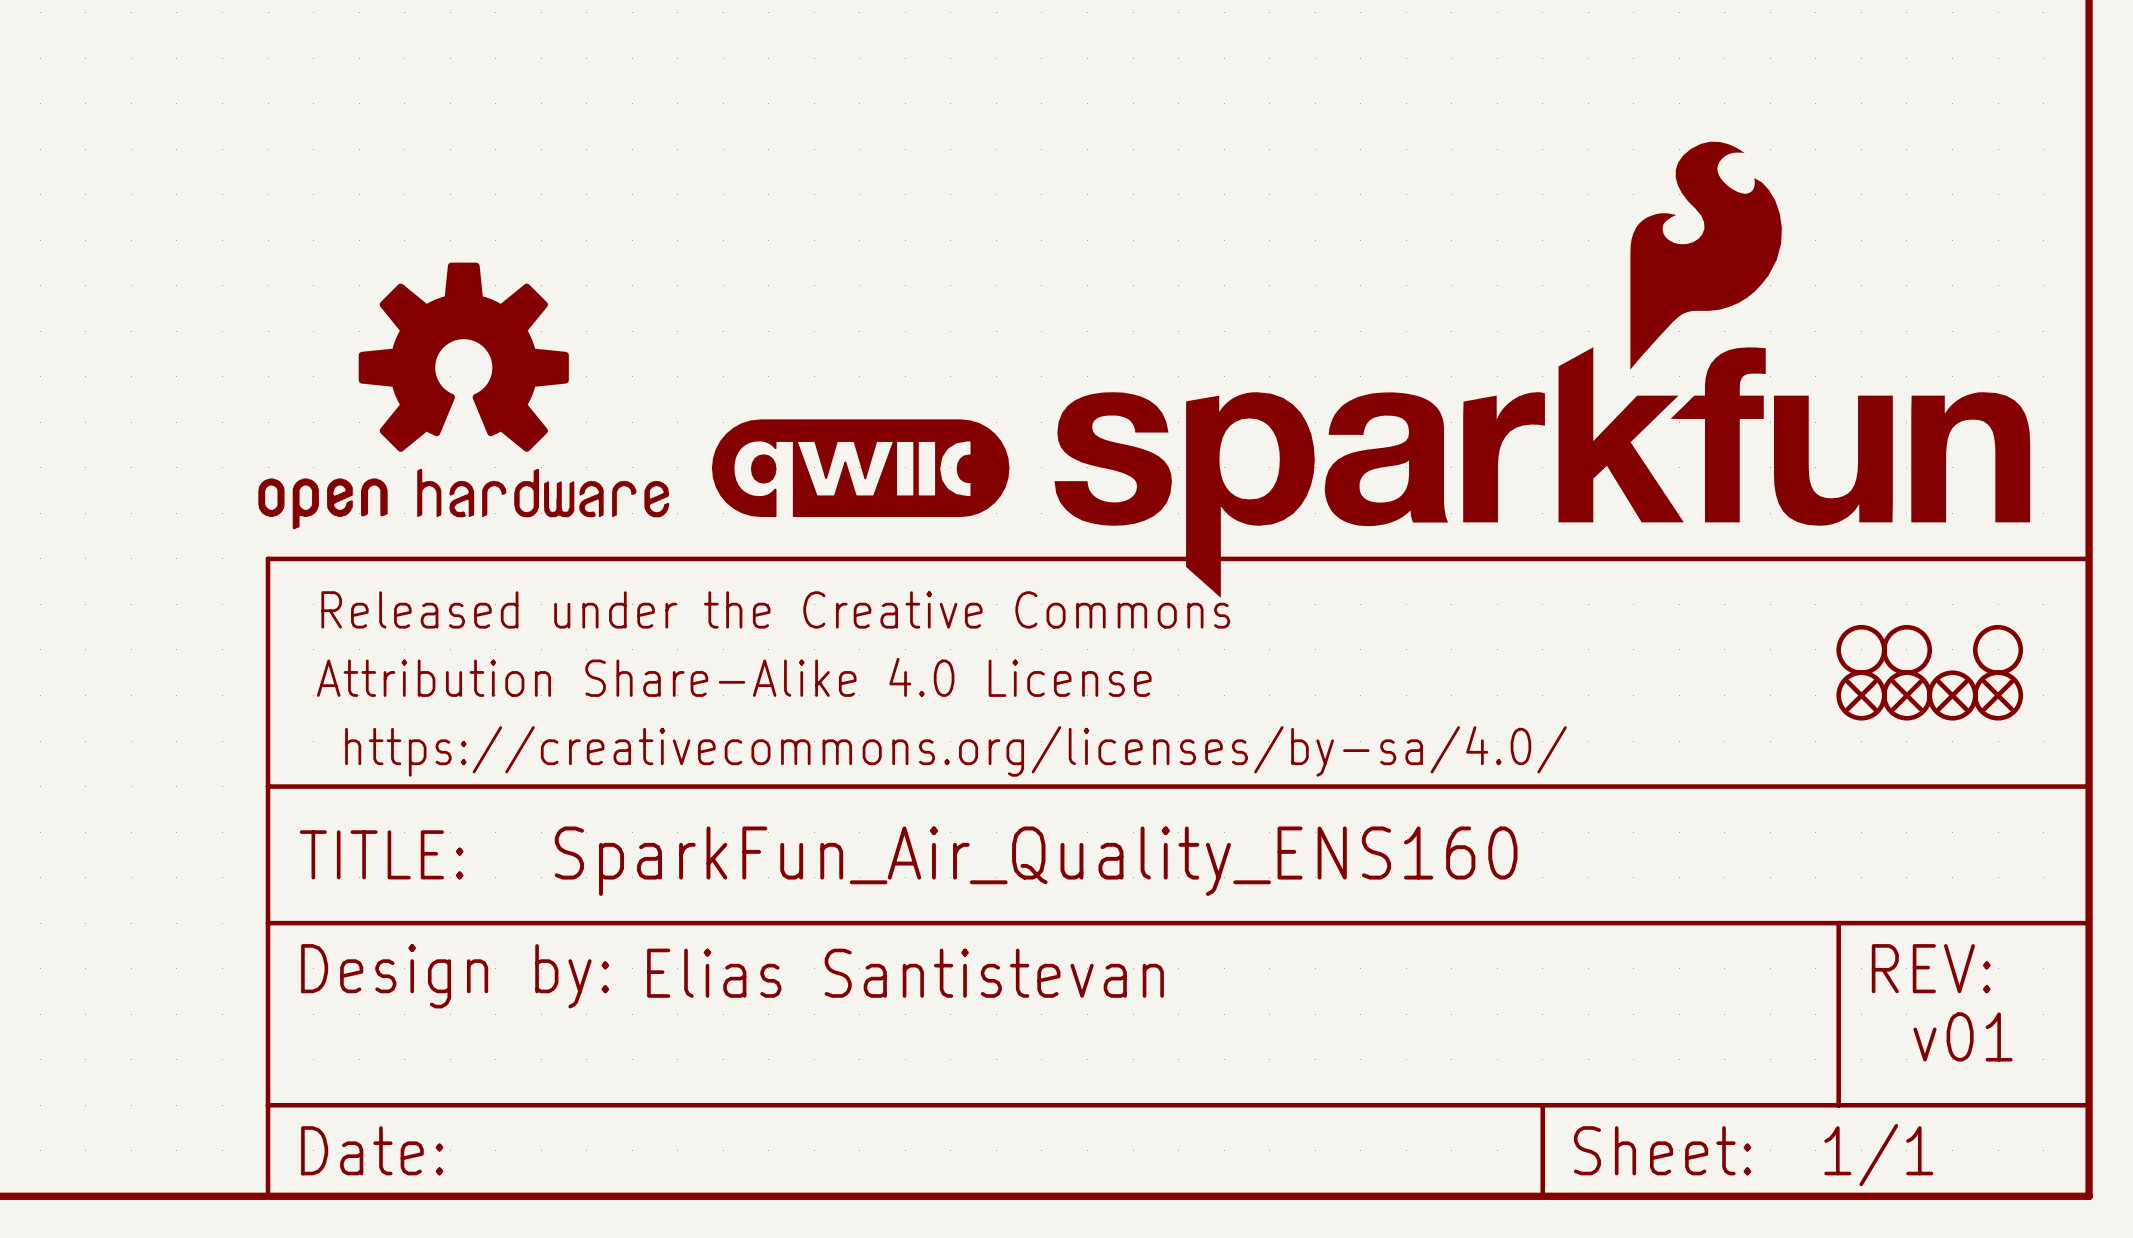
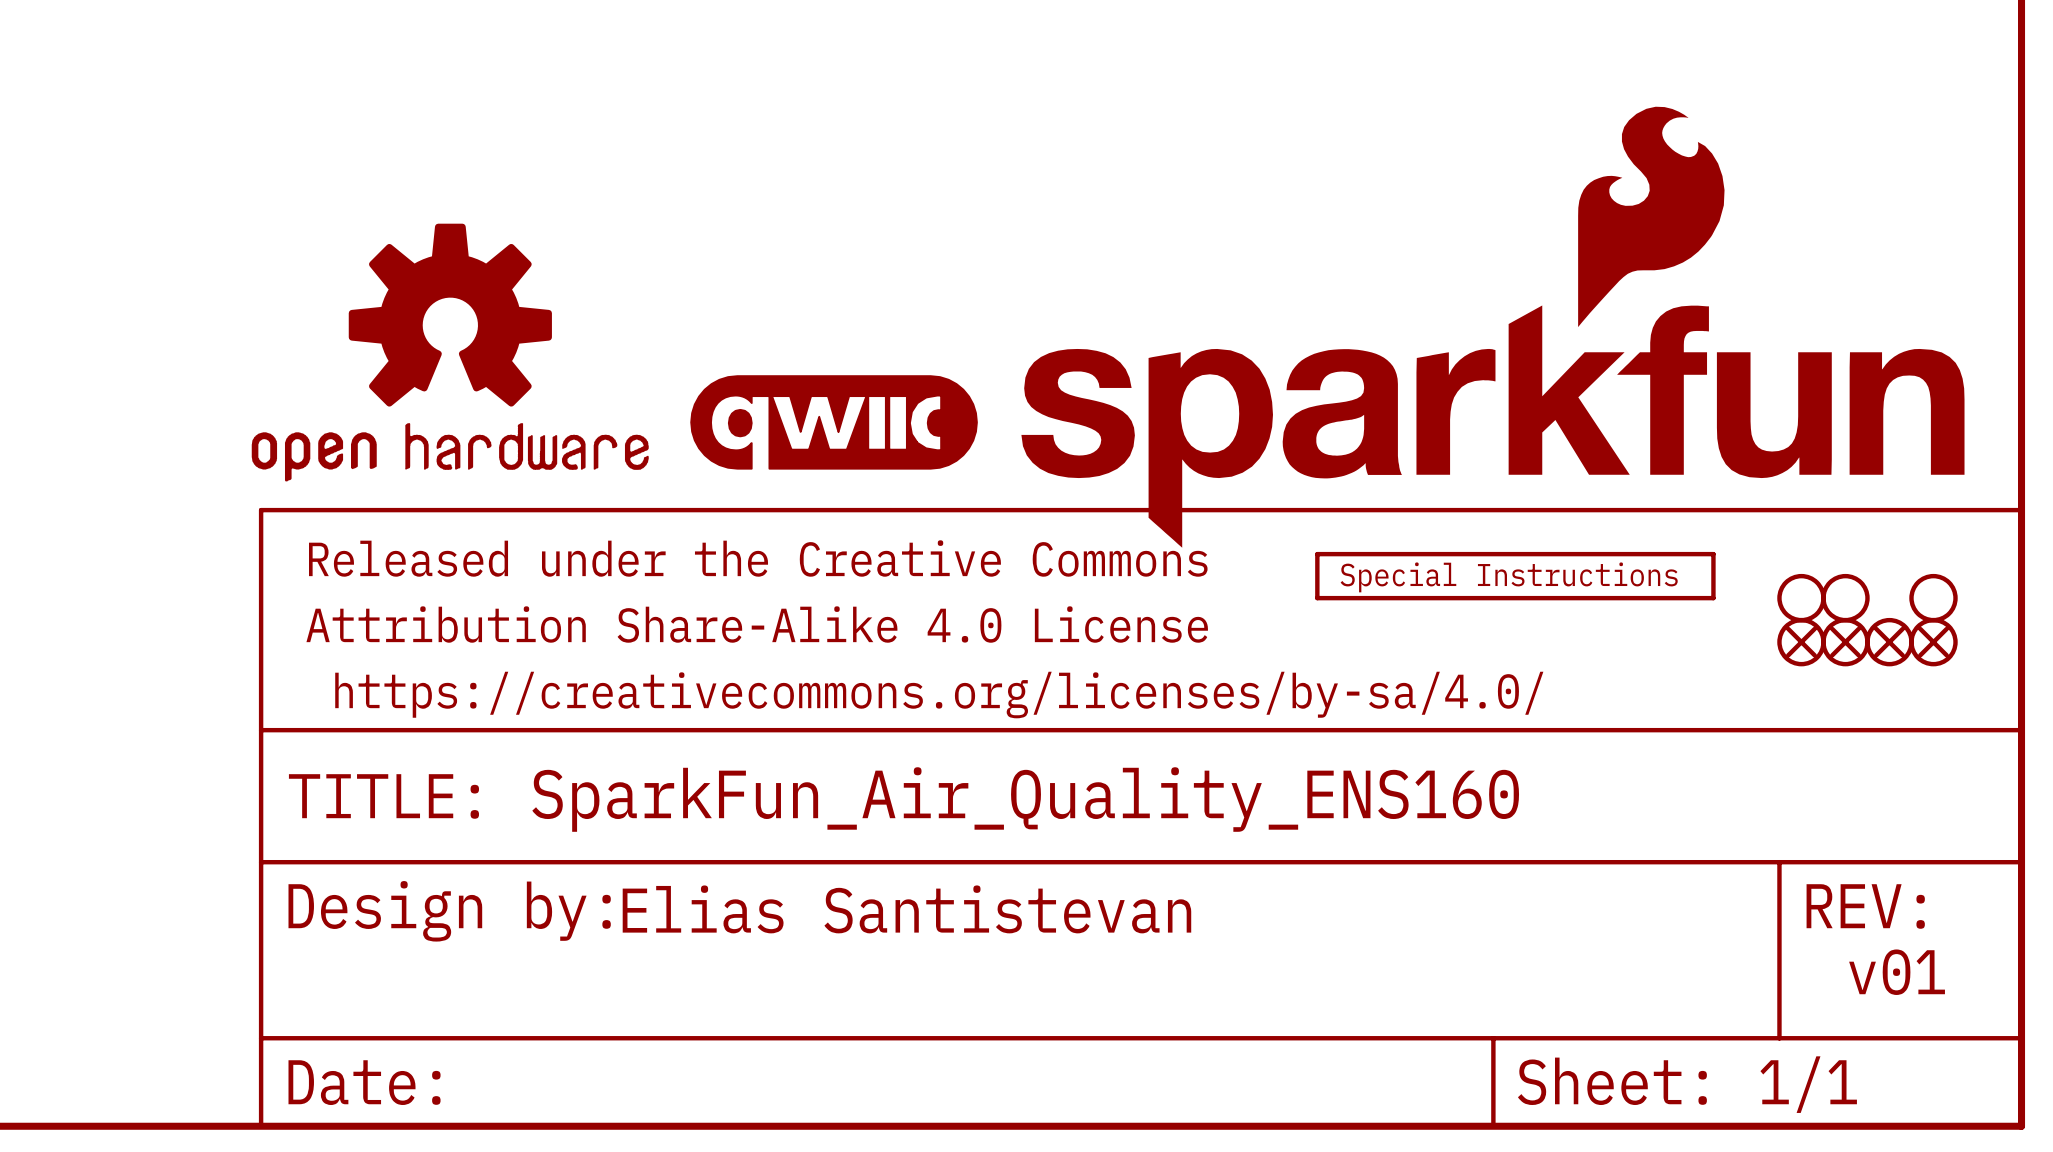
part: none -> (1515, 576)

